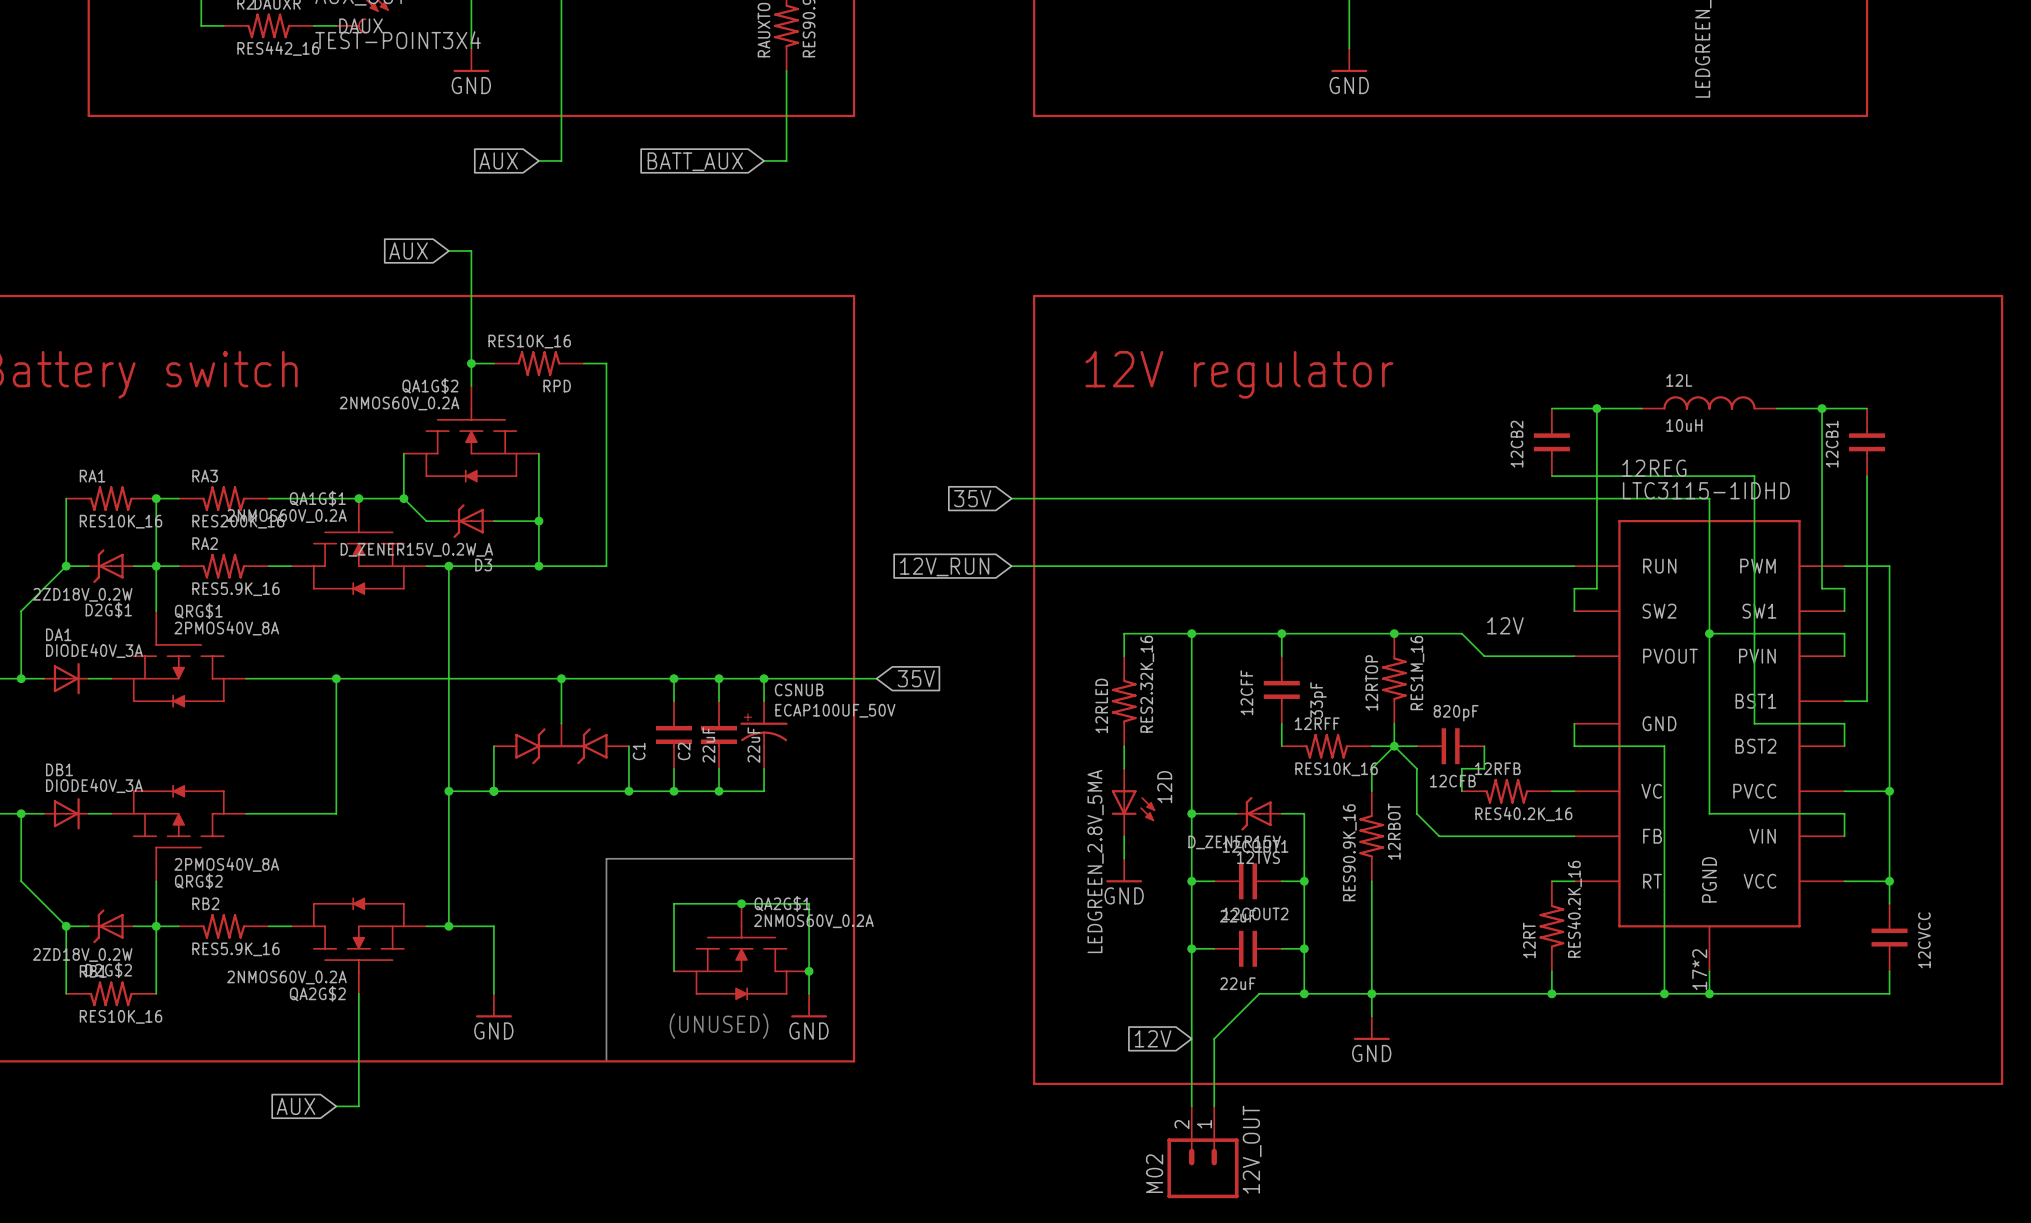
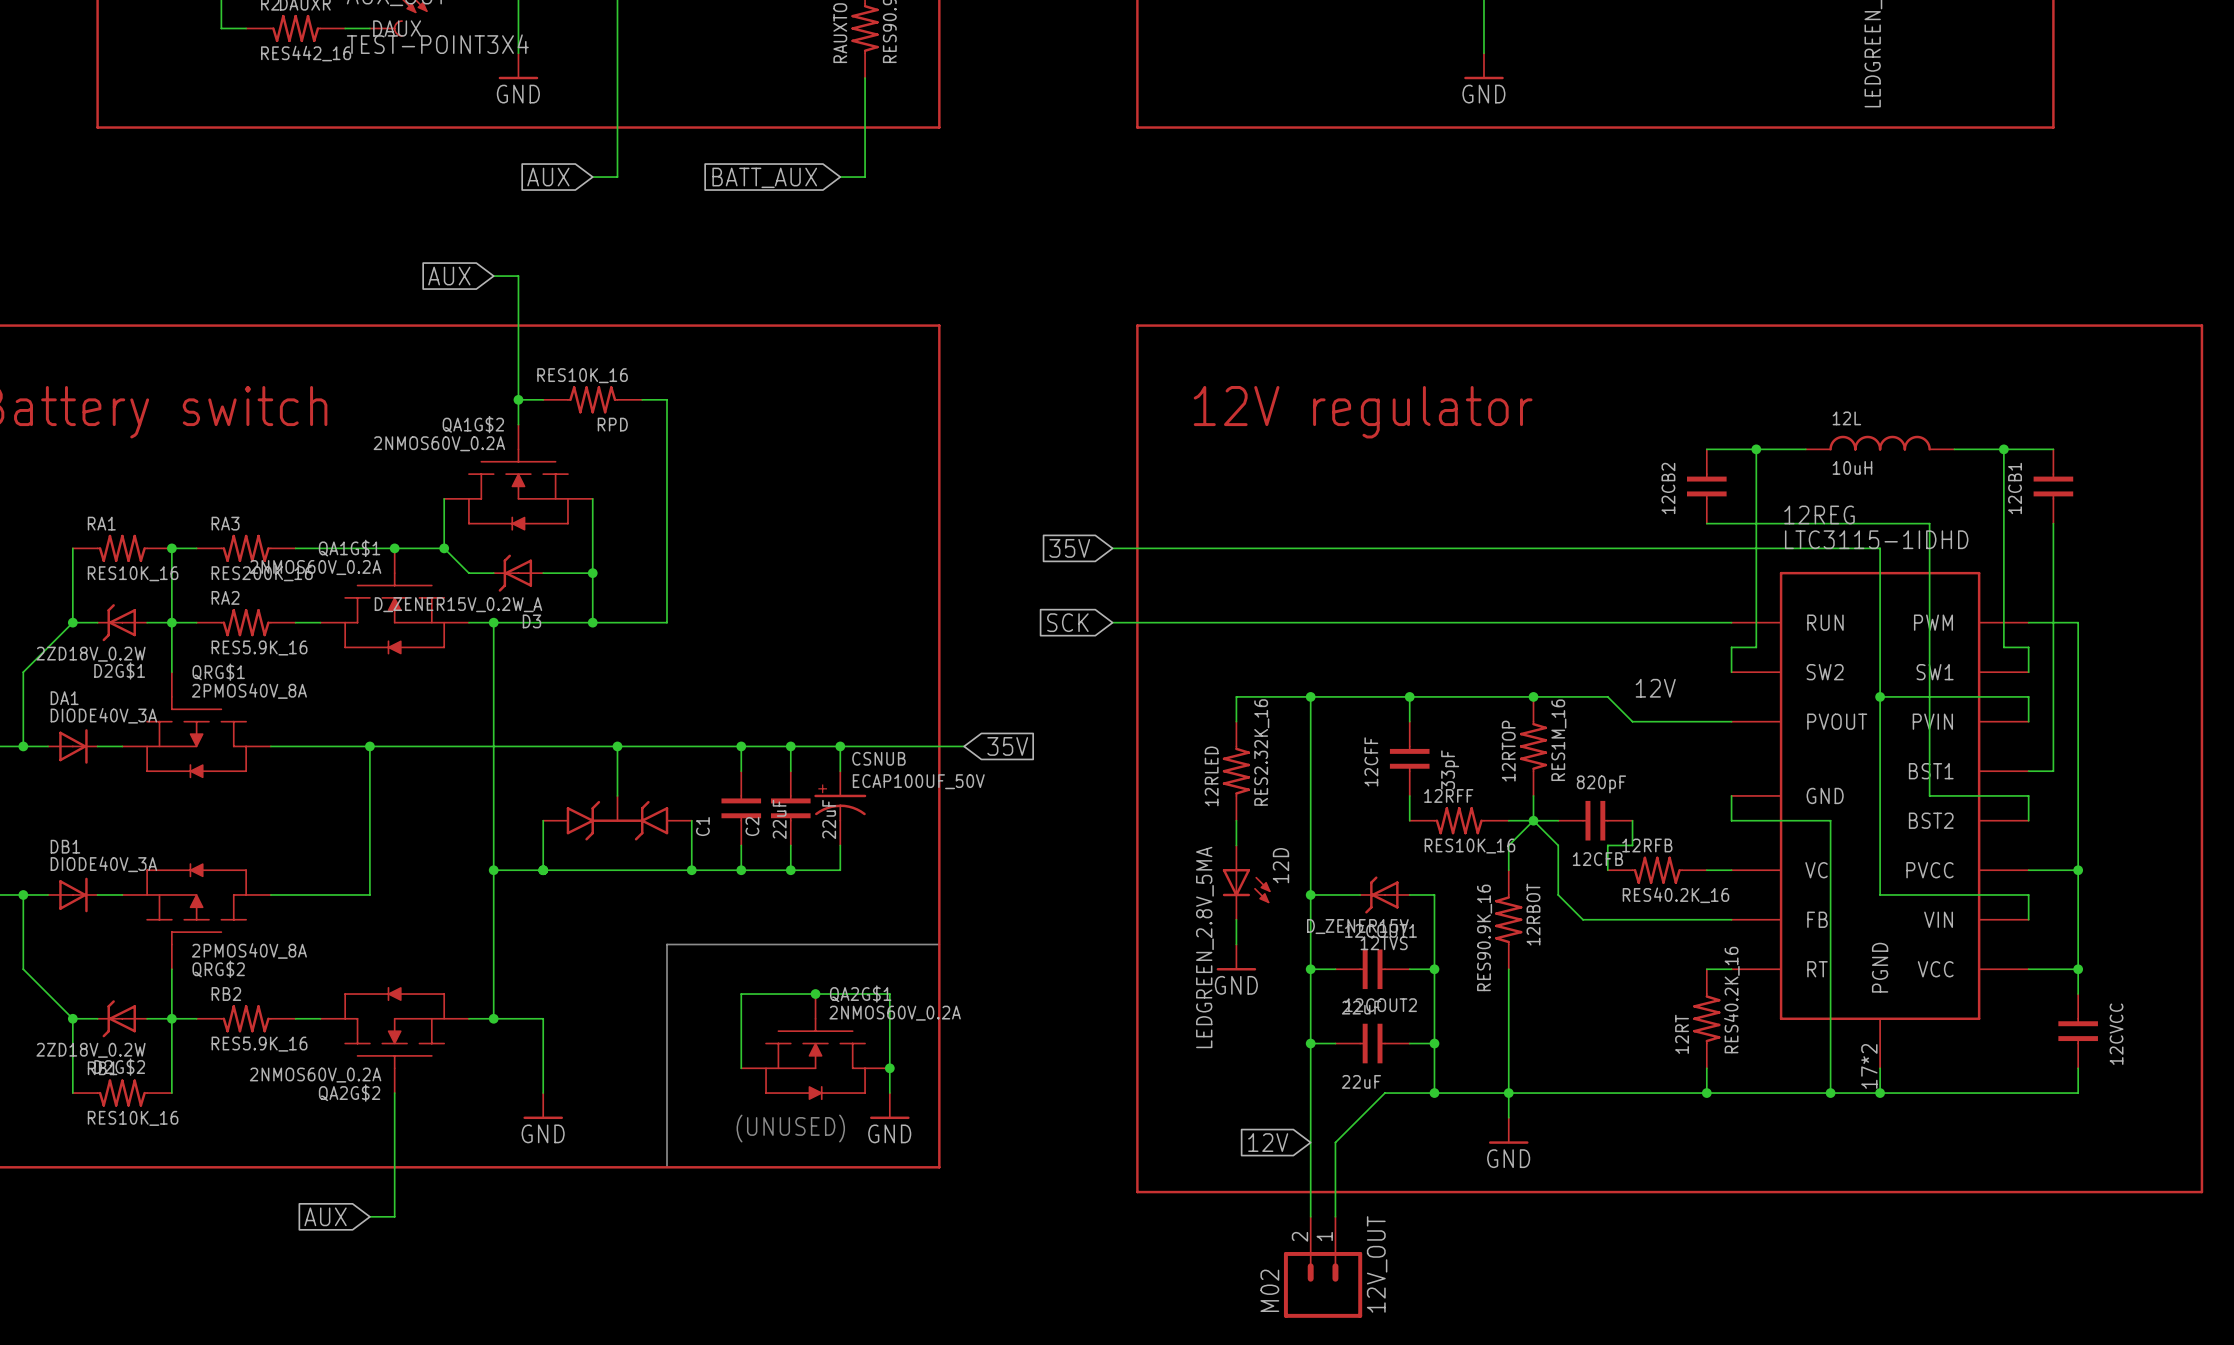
global label: 12V_RUN (944, 566) -> SCK (1067, 622)

